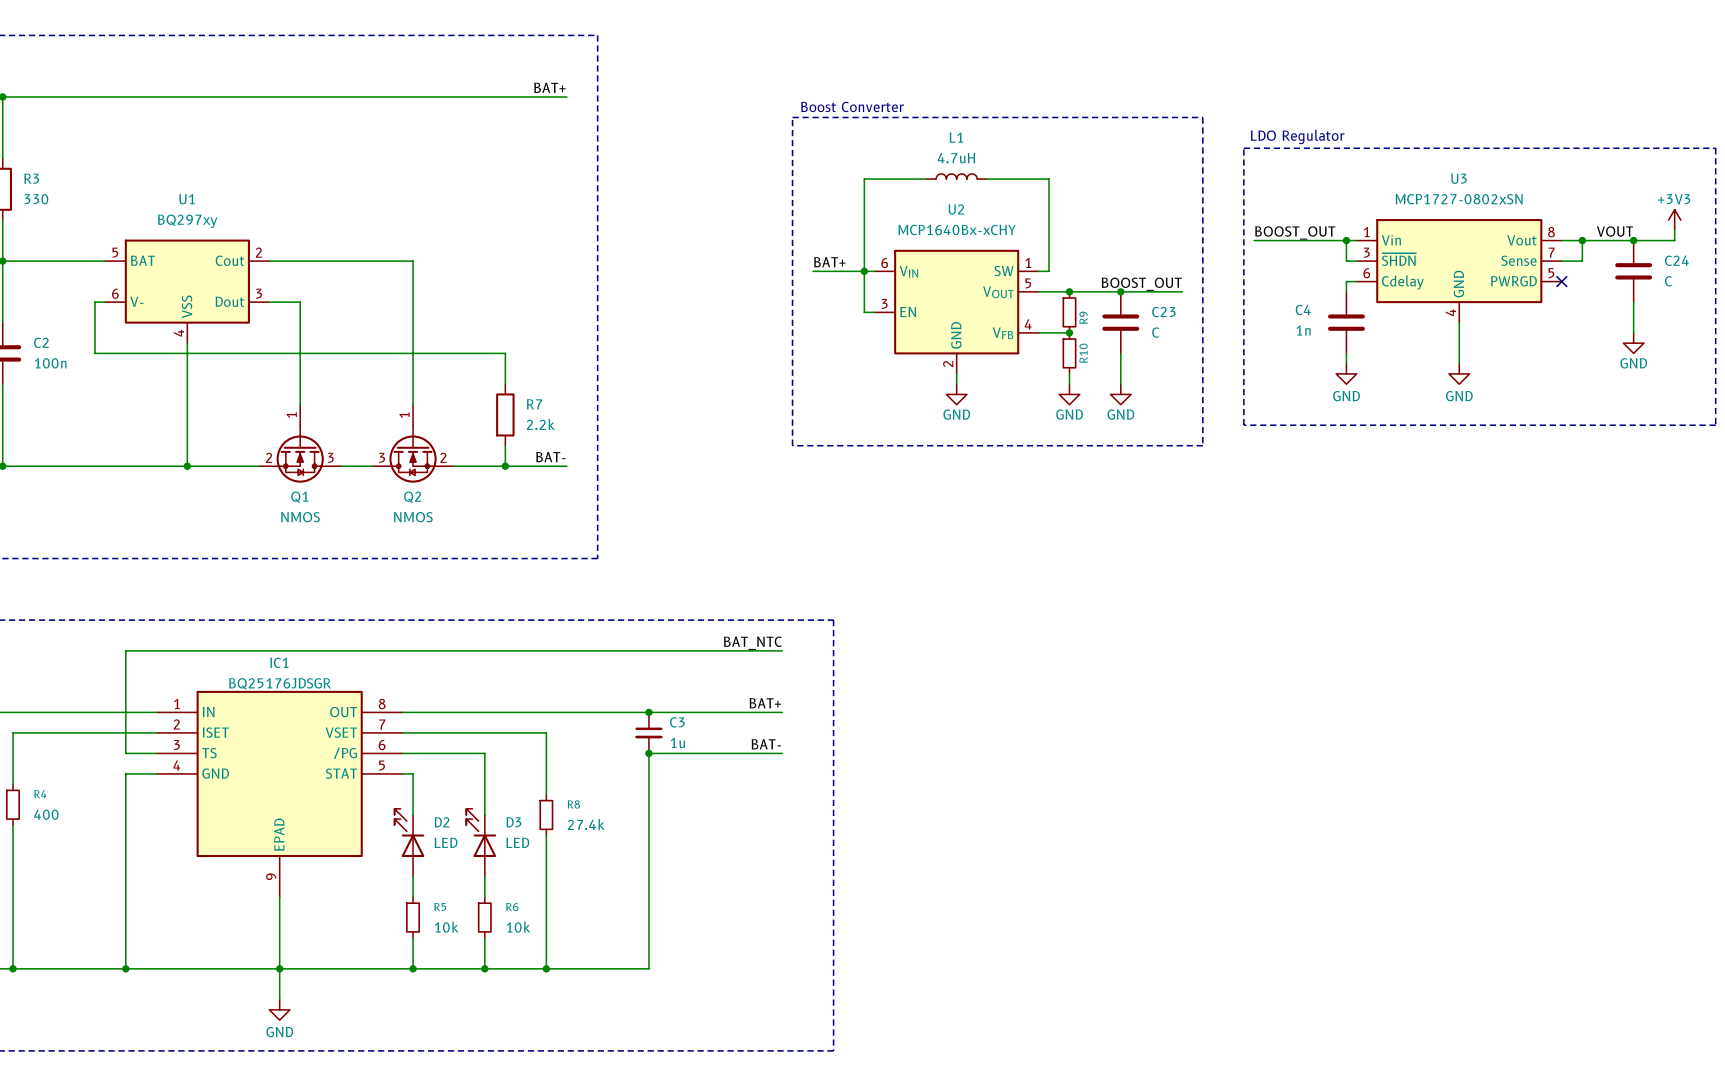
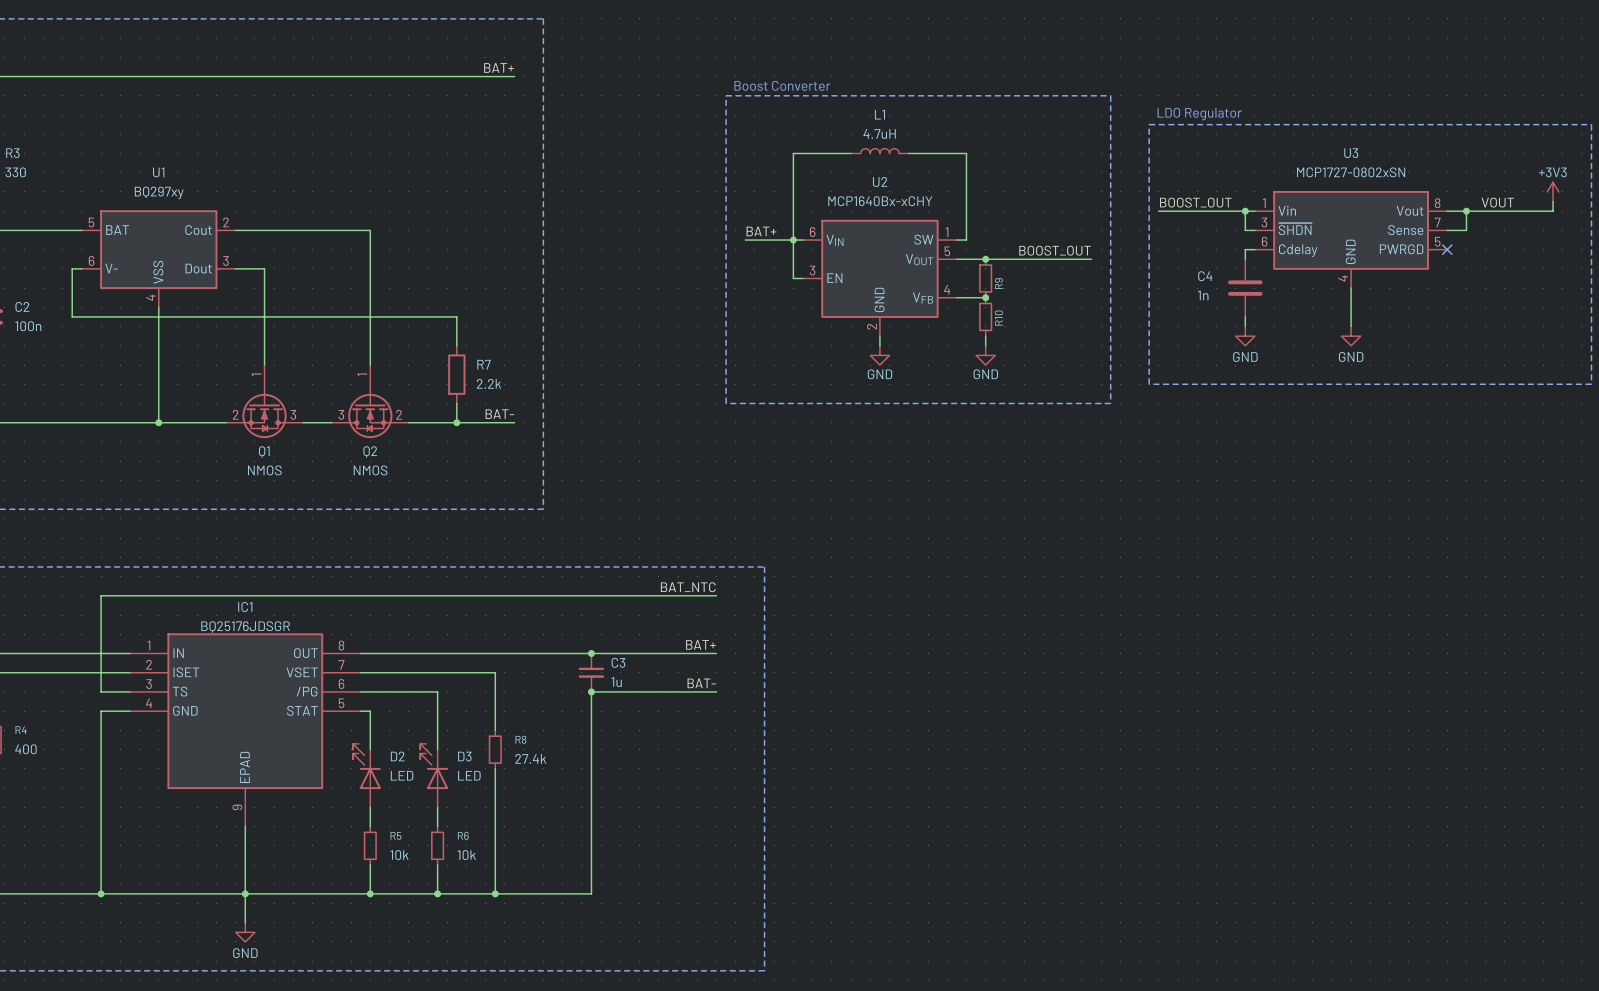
junction: (1633, 240) -> none
C24: C (1633, 271) -> none
junction: (1120, 291) -> none
wire: (1633, 302) (1633, 332) -> none
C23: C (1120, 322) -> none
power symbol: GND (1633, 343) -> none
wire: (1120, 353) (1120, 384) -> none
power symbol: GND (1120, 394) -> none

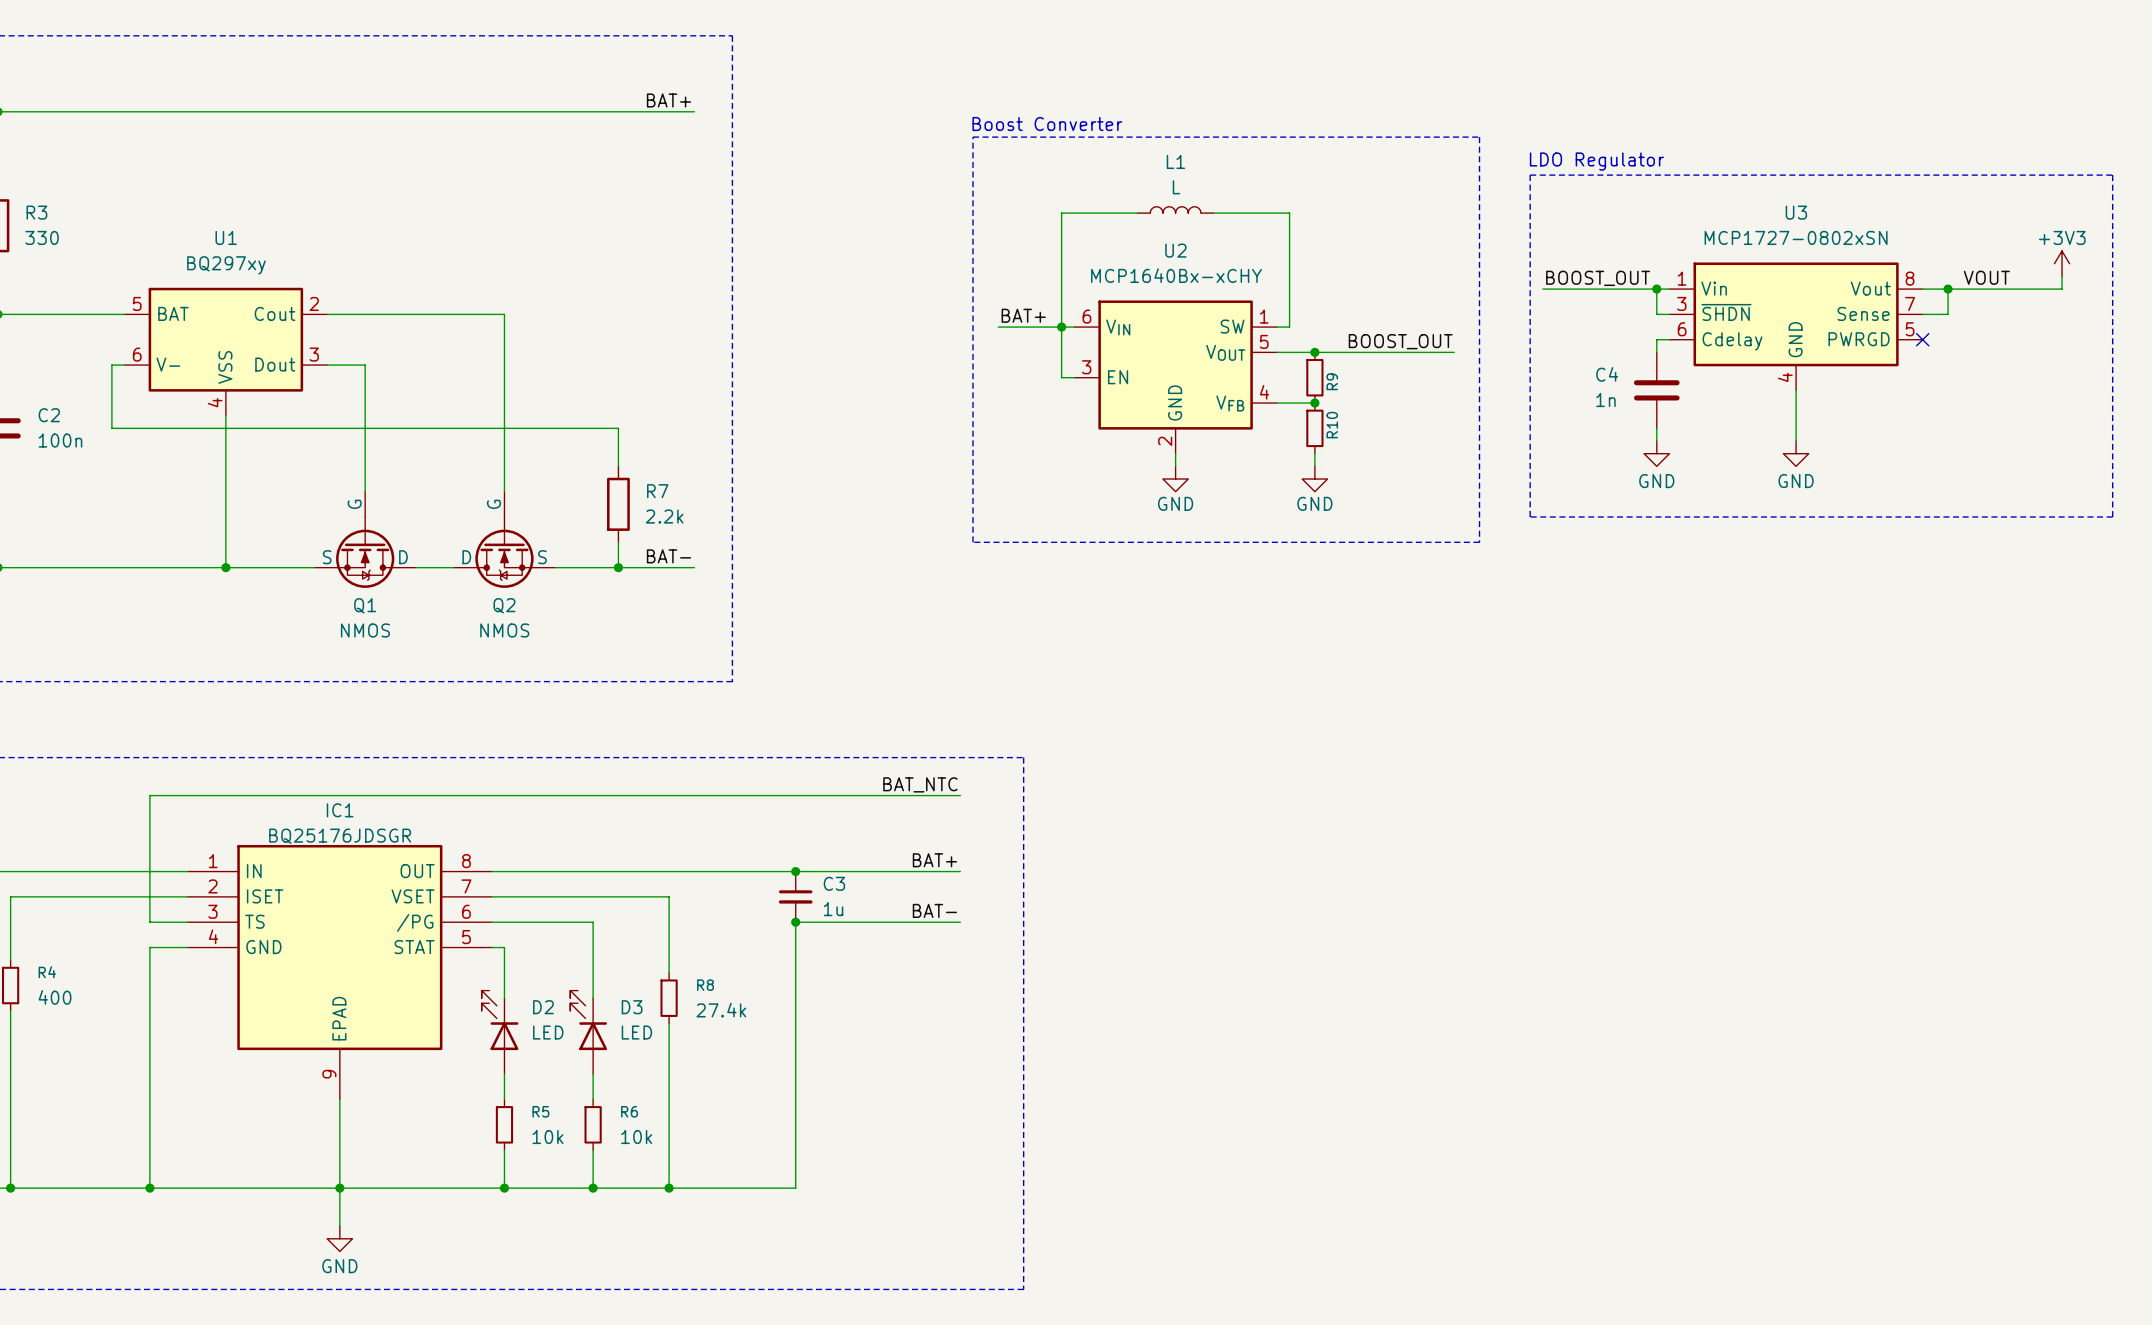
L1 value: 4.7uH (879, 133) -> L (1176, 187)
Q1 symbol: [226, 365, 303, 439] -> [314, 491, 416, 588]
Q2 symbol: [331, 365, 409, 439] -> [453, 491, 556, 588]

